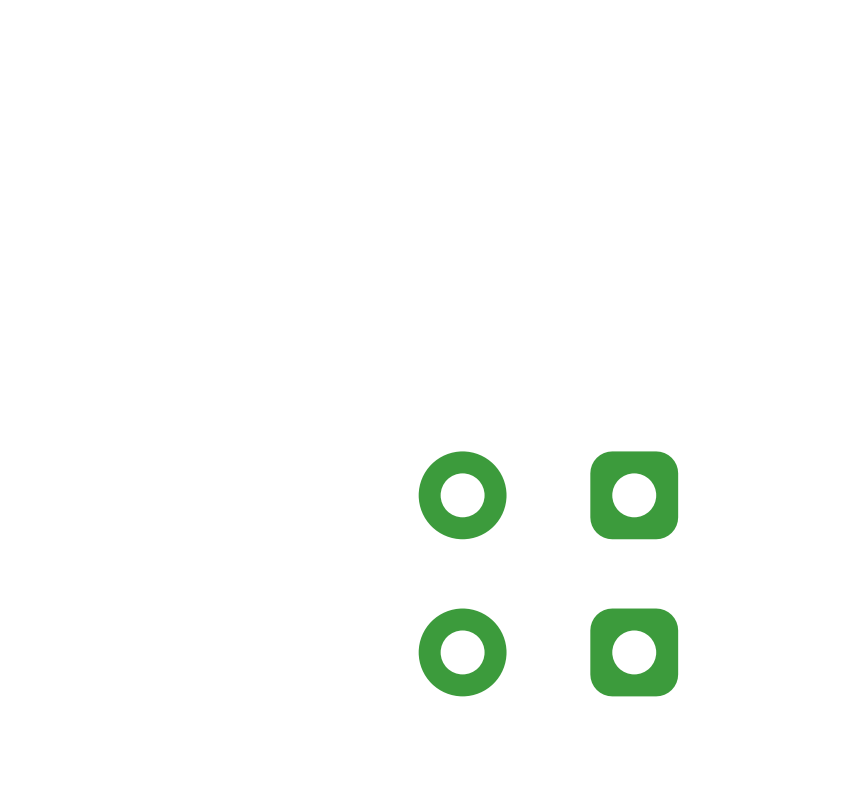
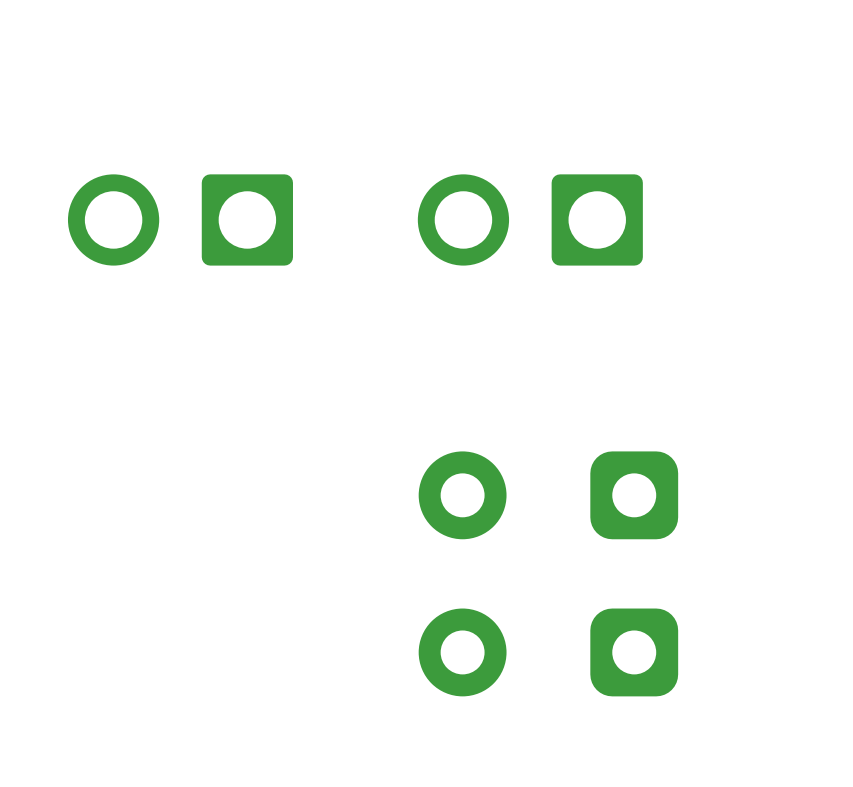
part: none -> (180, 219)
part: none -> (530, 219)

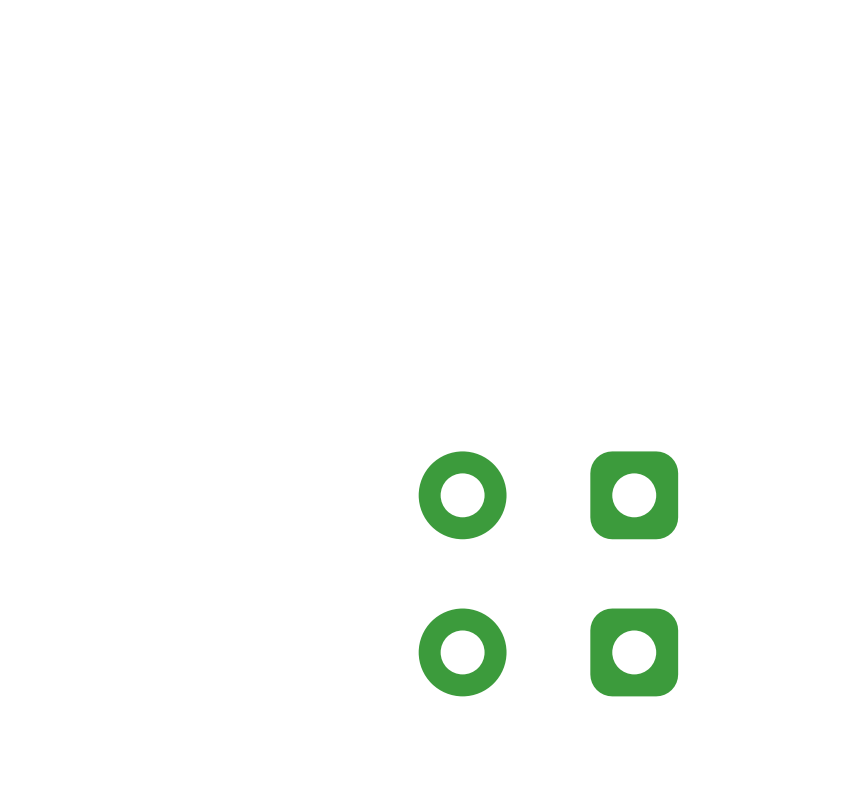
part: (180, 219) -> none
part: (530, 219) -> none

